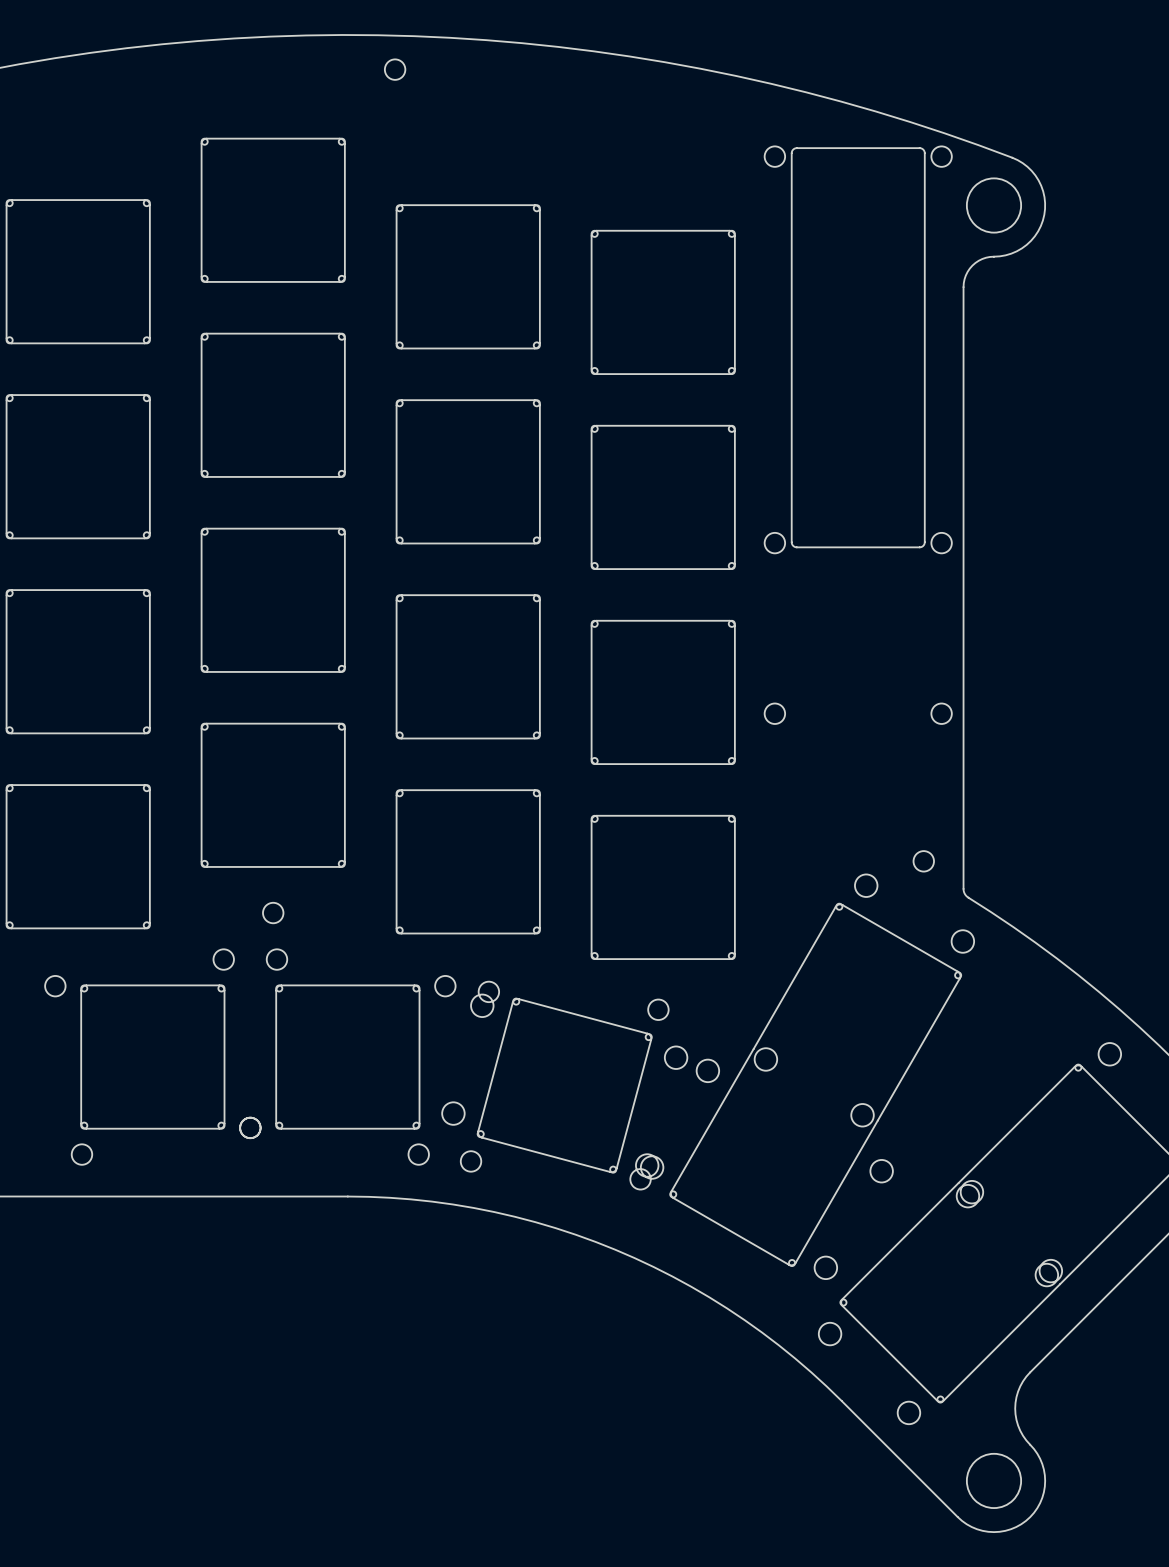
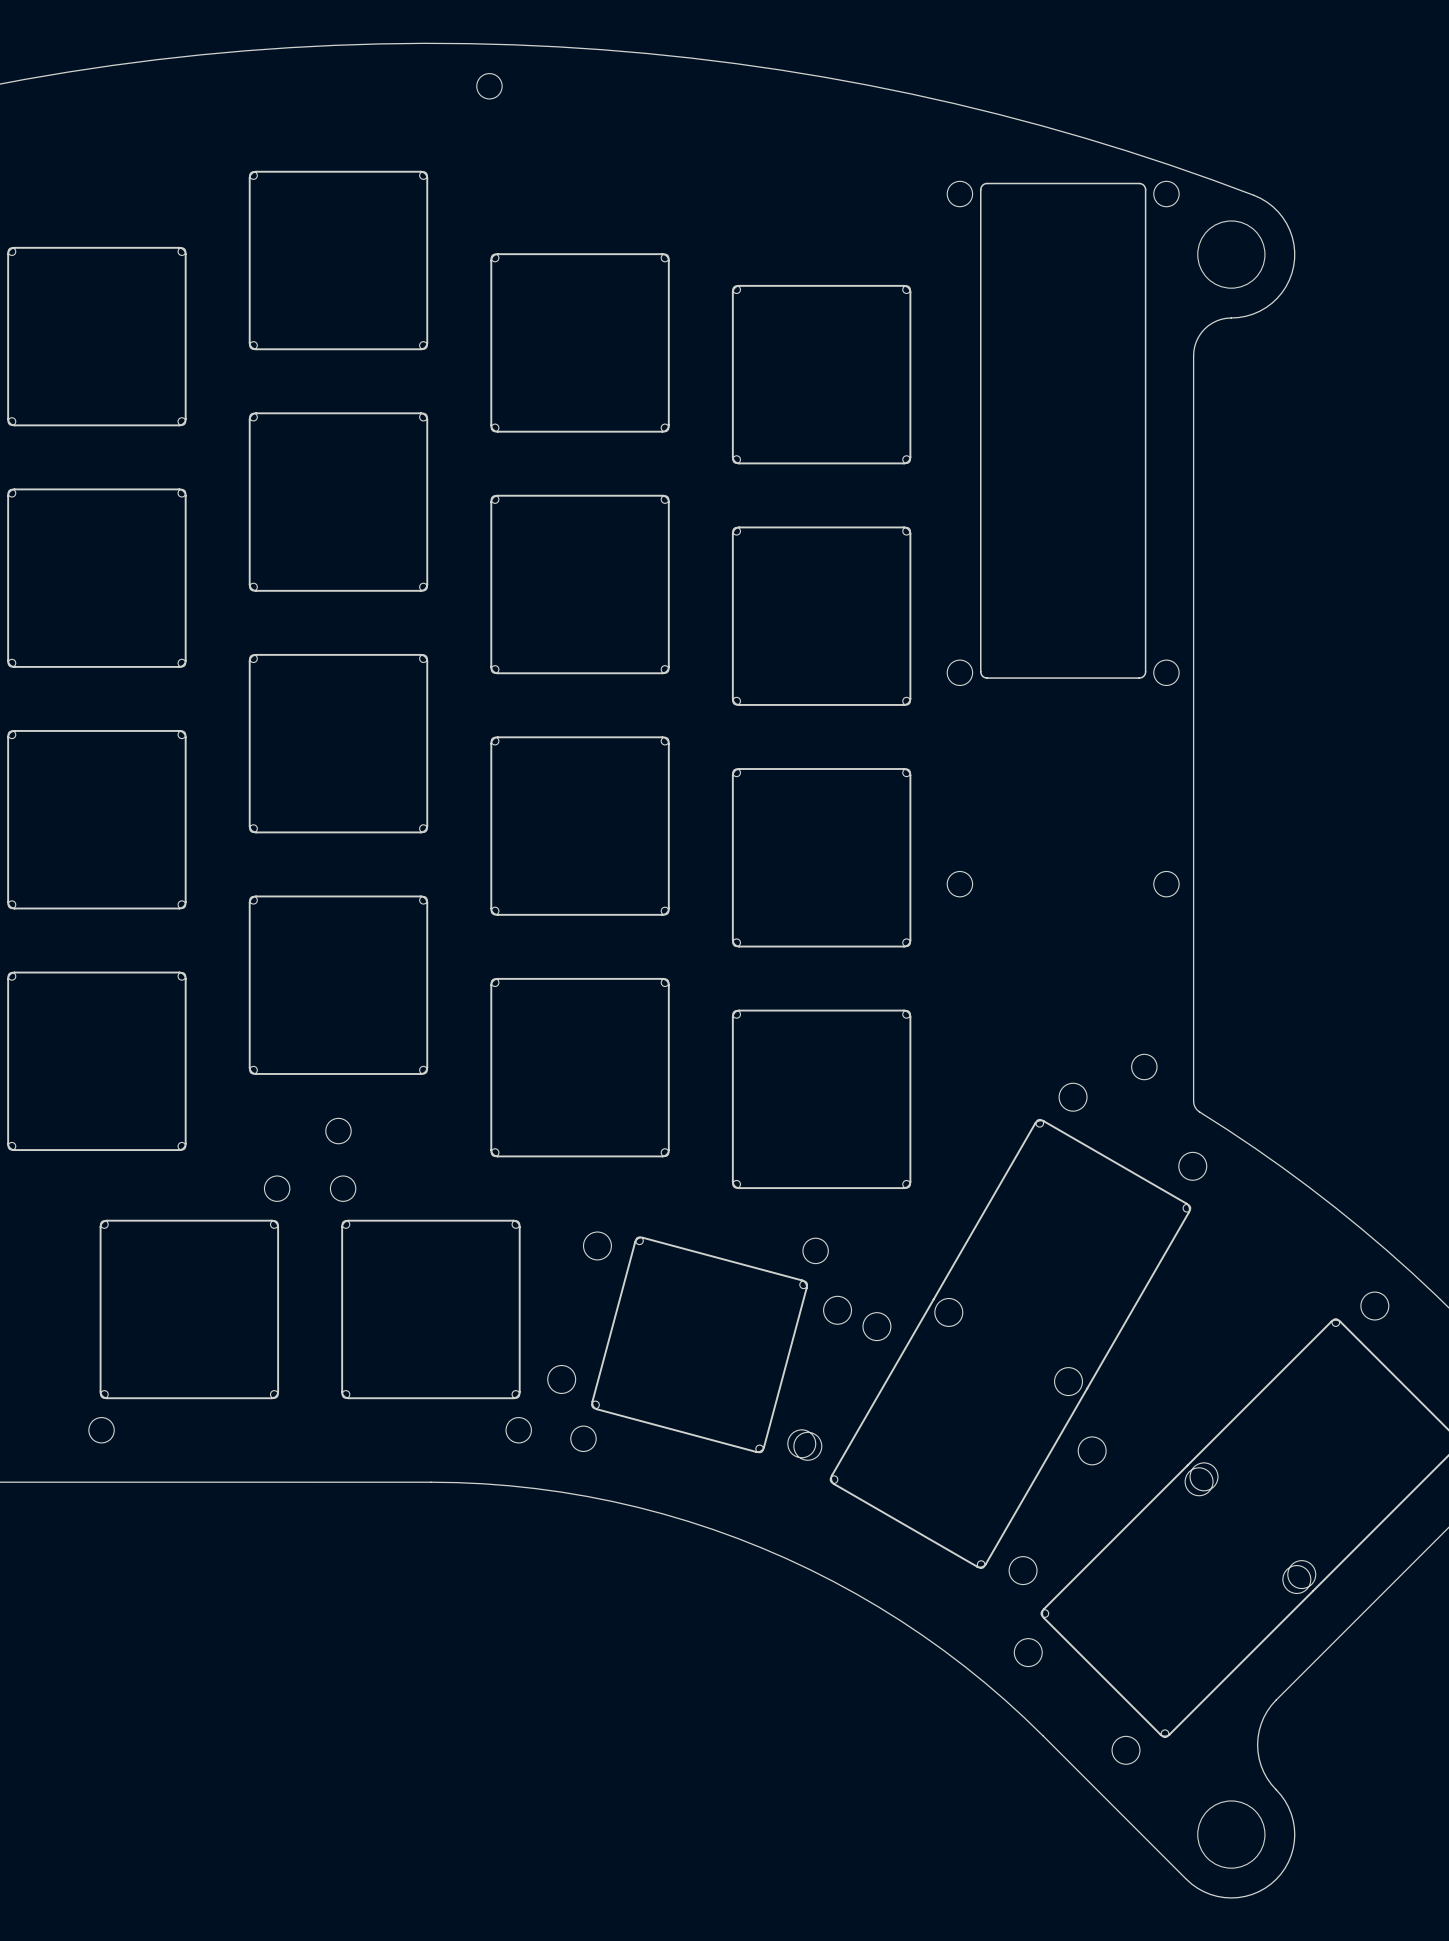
part footprint: [45, 949, 261, 1165] -> [88, 1175, 290, 1443]
part footprint: [240, 949, 456, 1165] -> [330, 1175, 532, 1443]
part footprint: [460, 981, 669, 1190] -> [570, 1236, 829, 1454]

